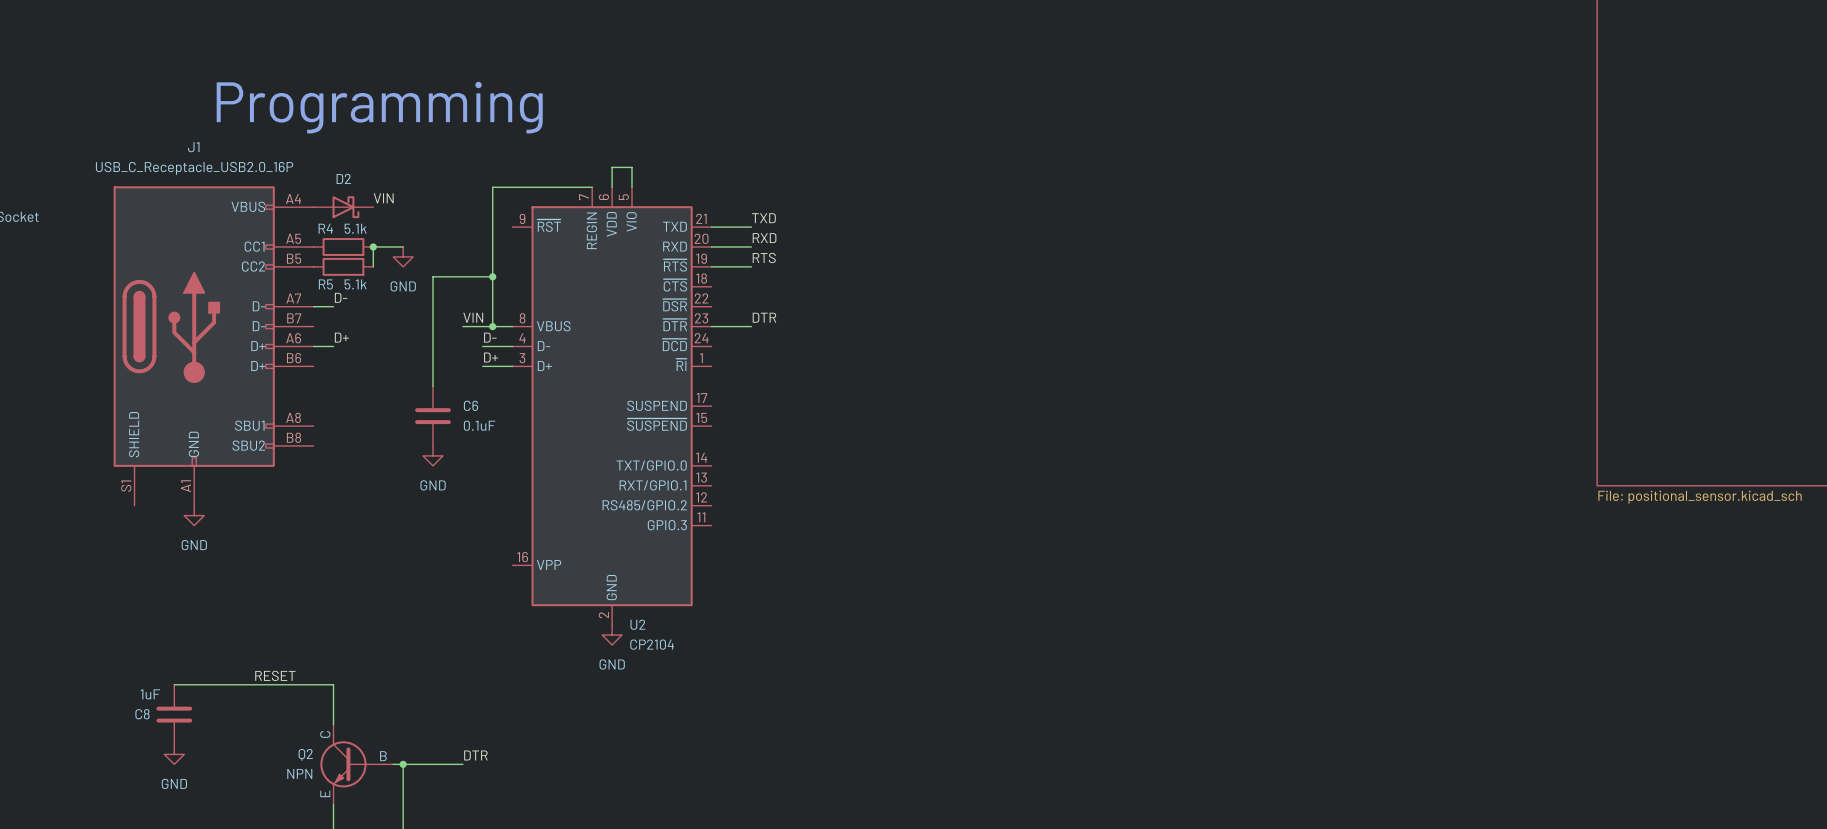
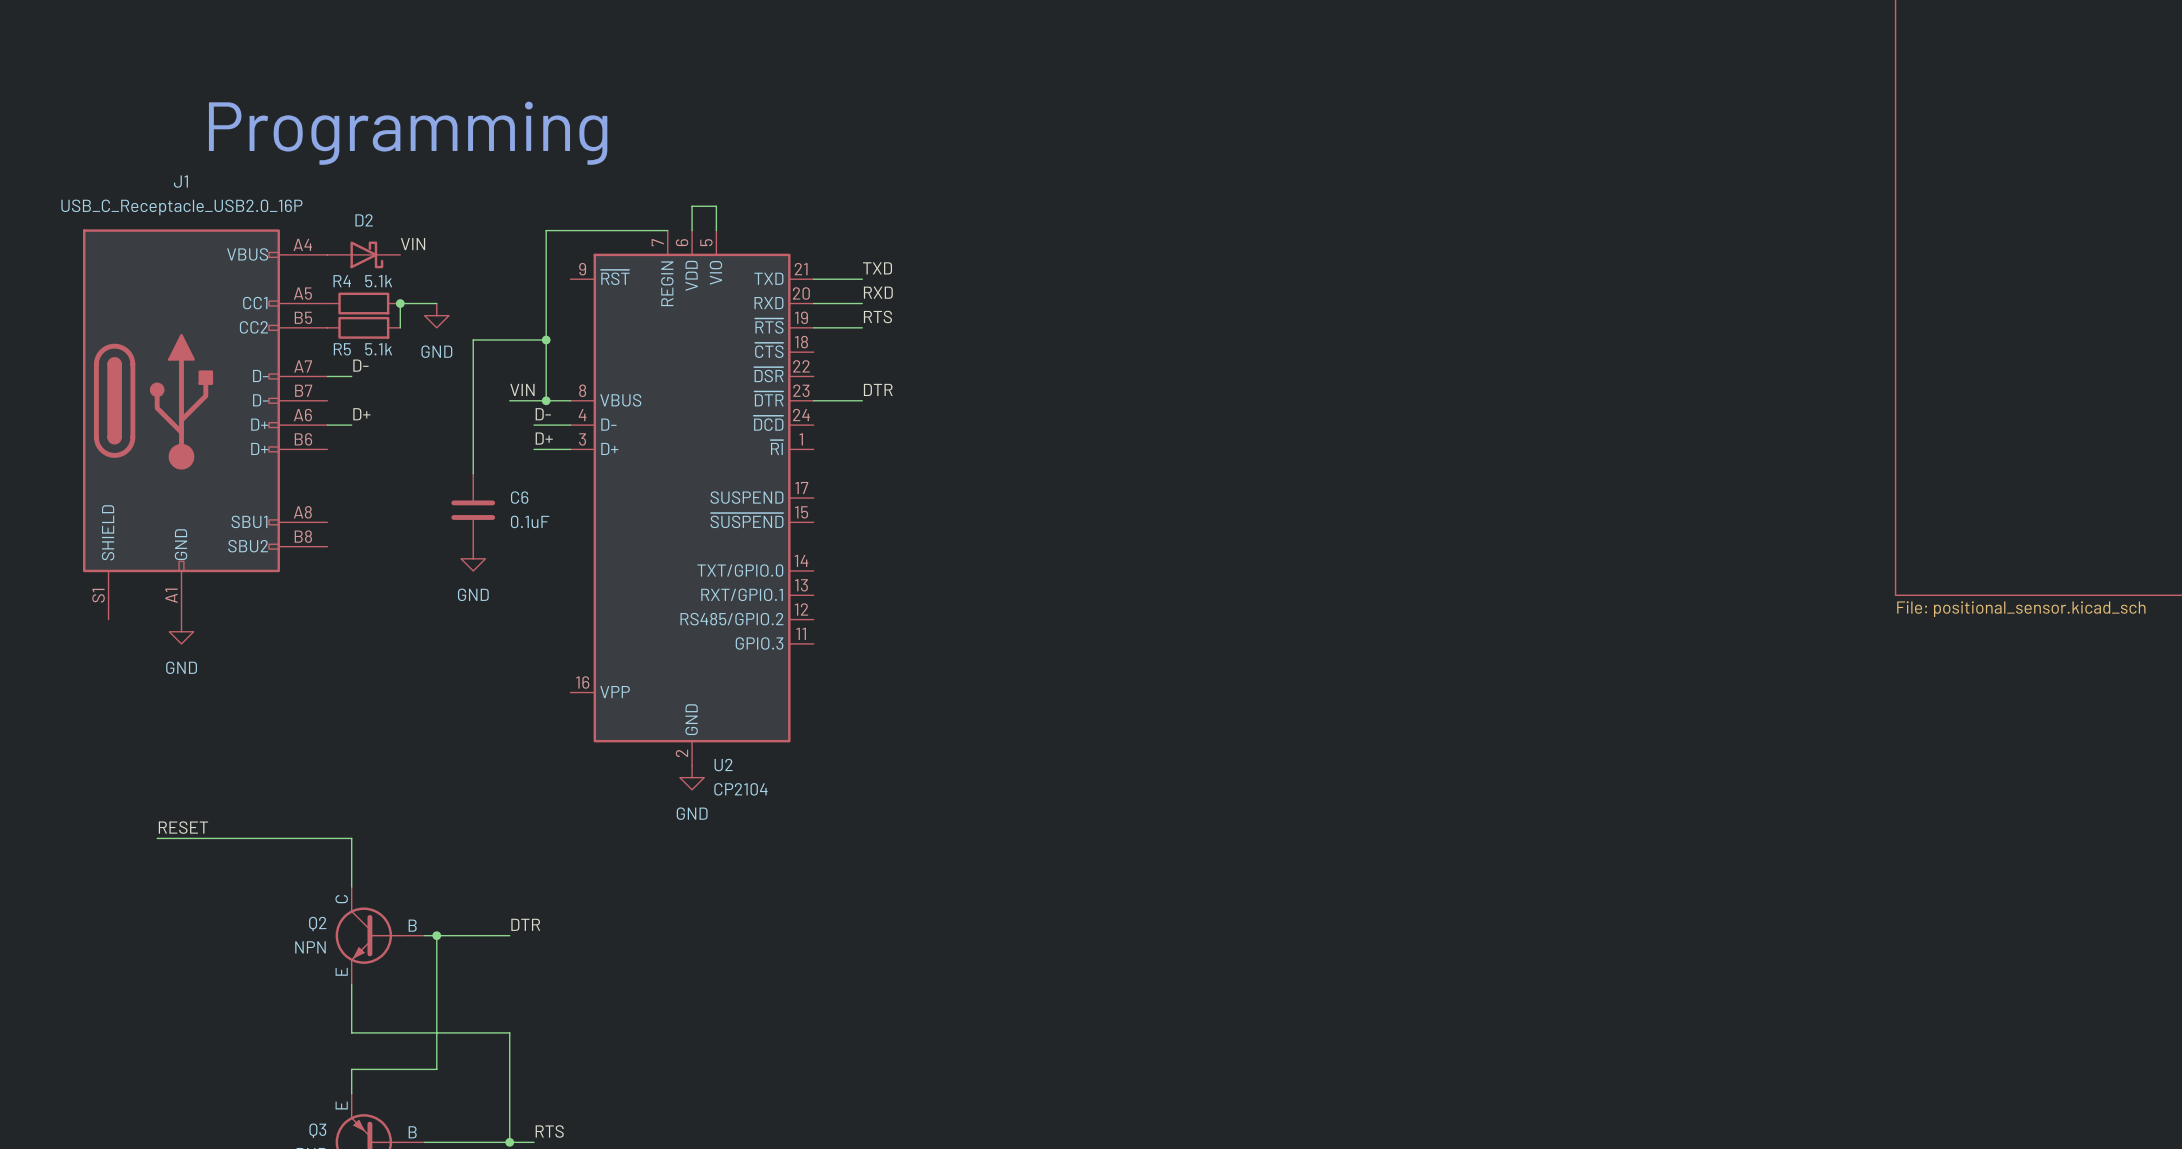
label position: RESET (275, 675) -> RESET (183, 827)
C8: 1uF (174, 714) -> none
power symbol: GND (174, 754) -> none

